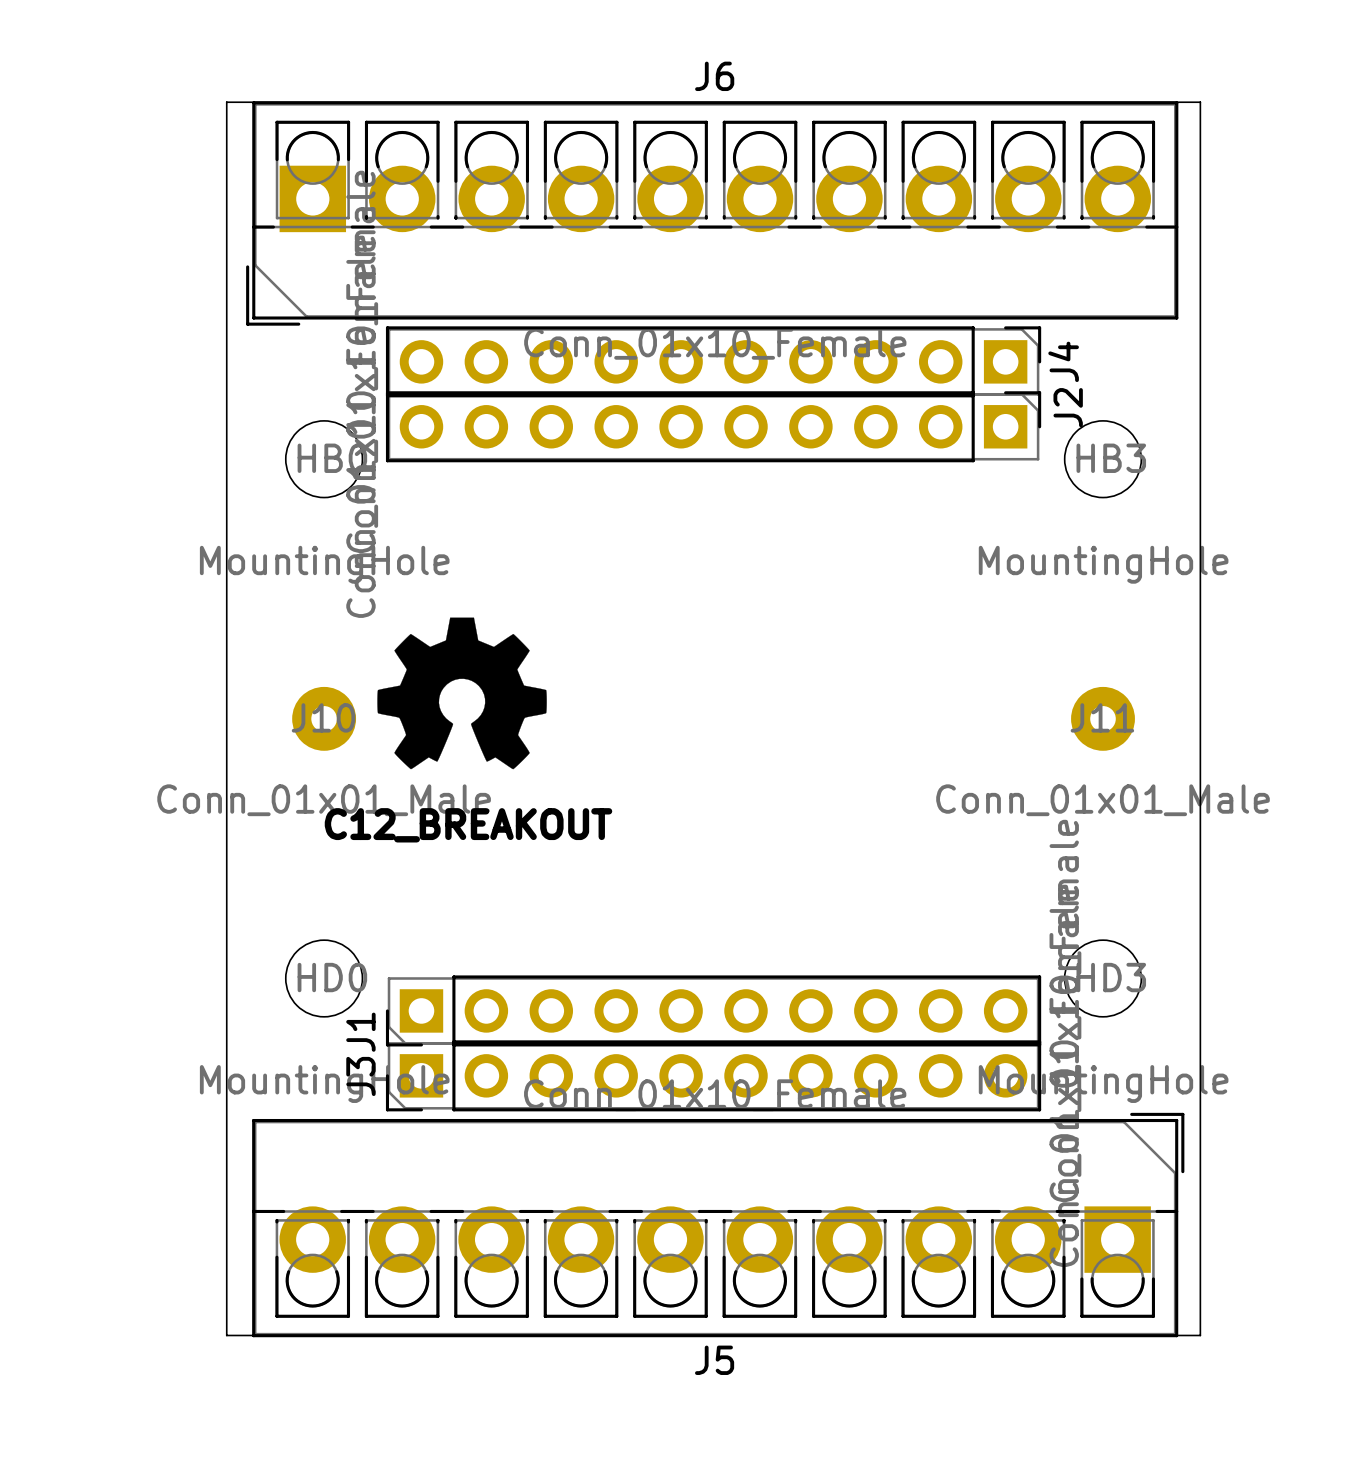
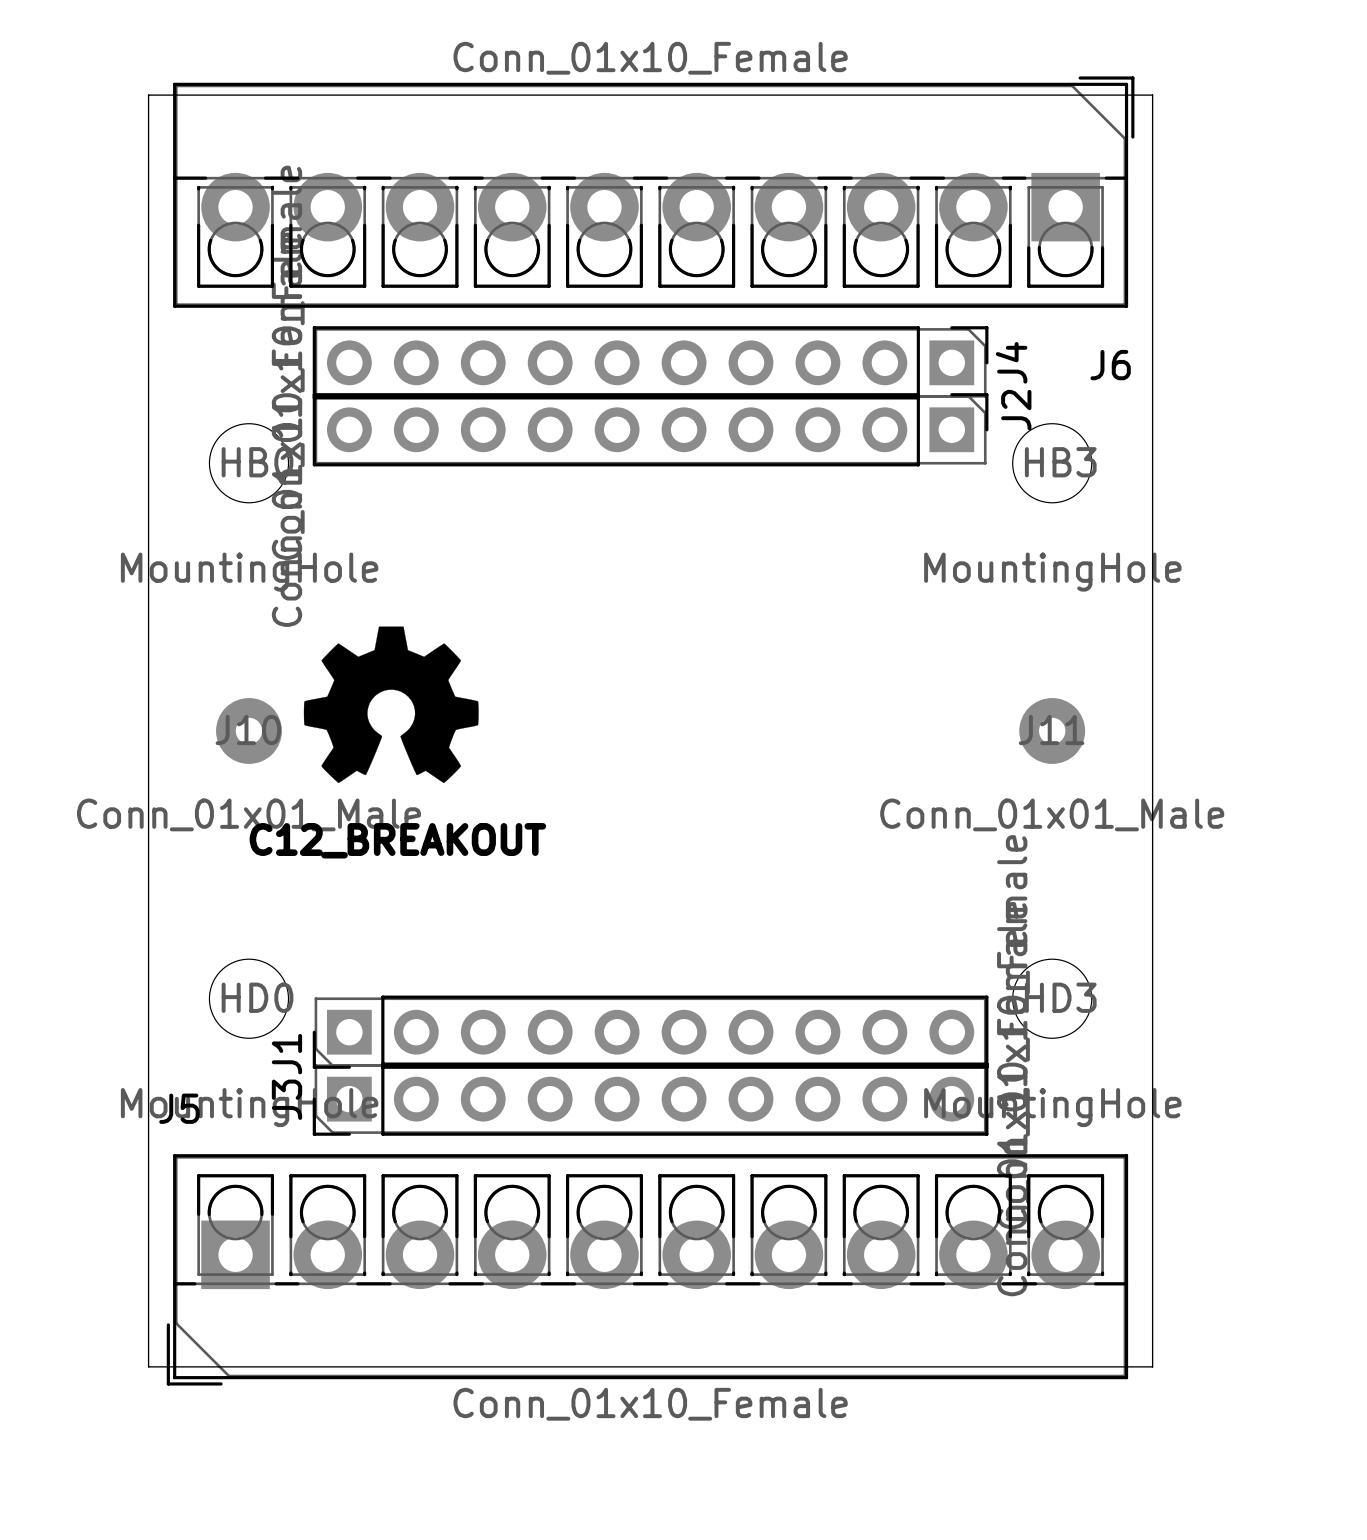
J6 name position: J6 (714, 76) -> J6 (1110, 365)
J6 rotation: 0° (712, 213) -> 180° (653, 192)
J5 rotation: 0° (718, 1225) -> 180° (647, 1269)
J5 name position: J5 (714, 1360) -> J5 (179, 1108)

